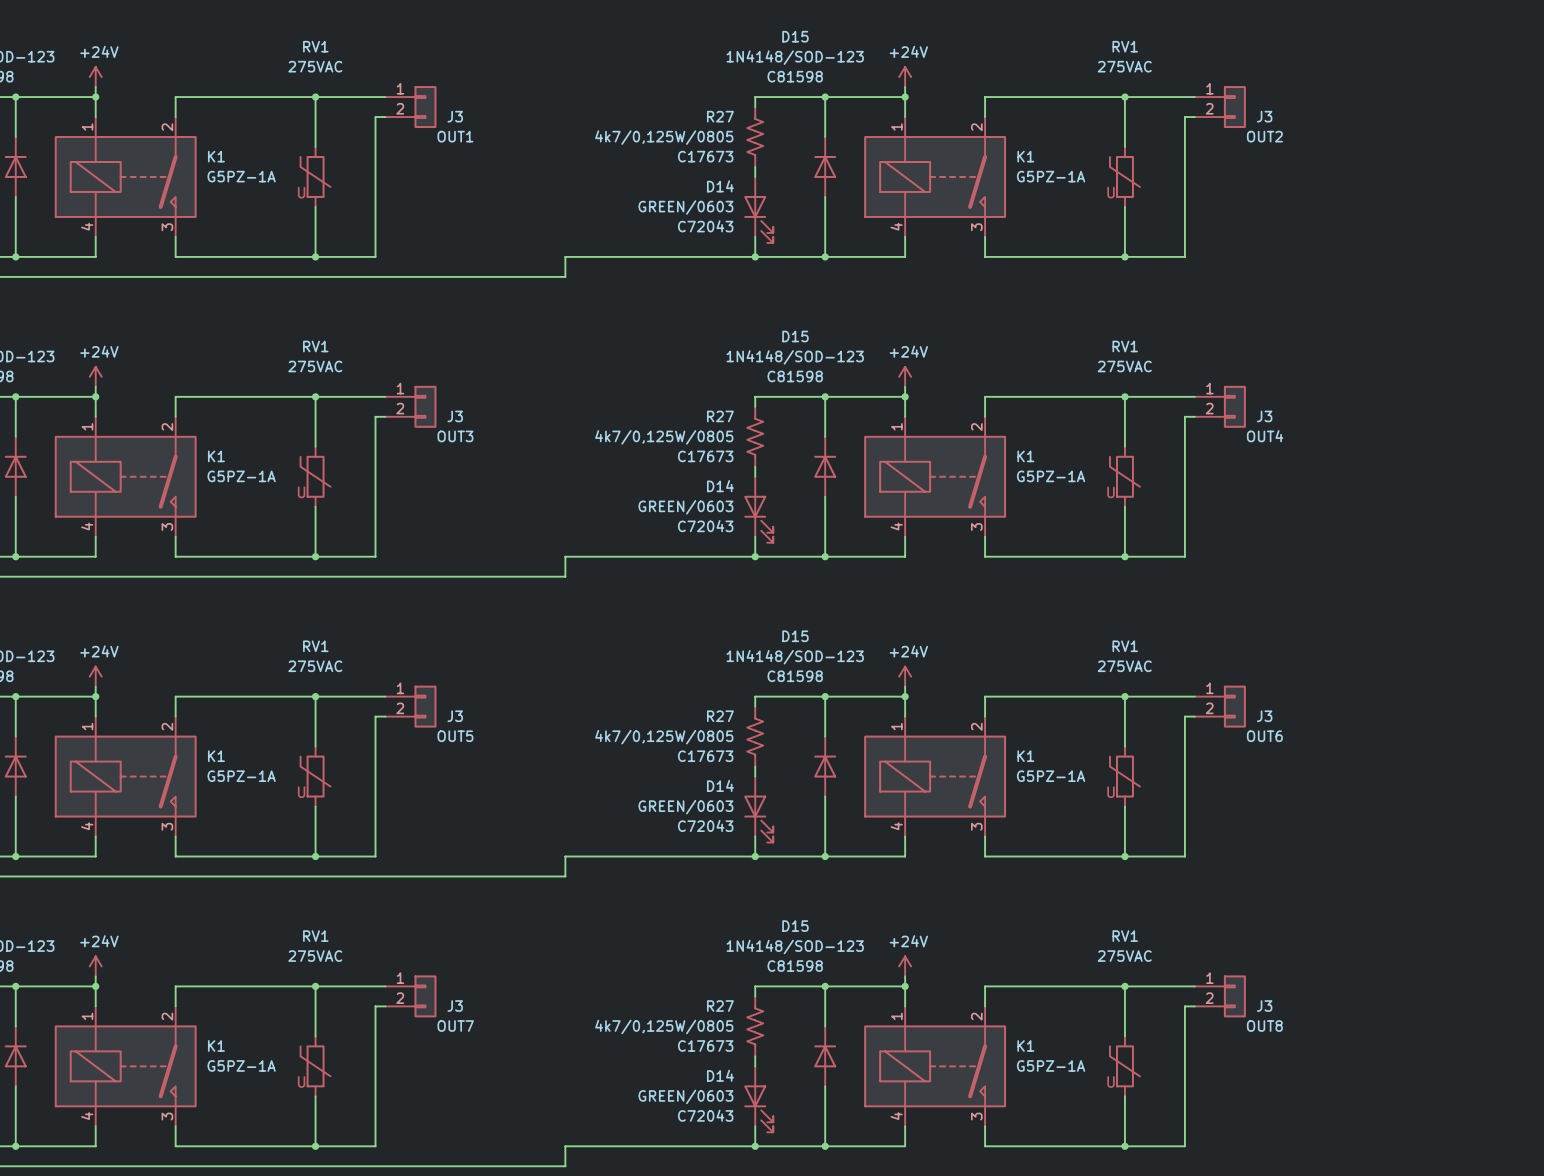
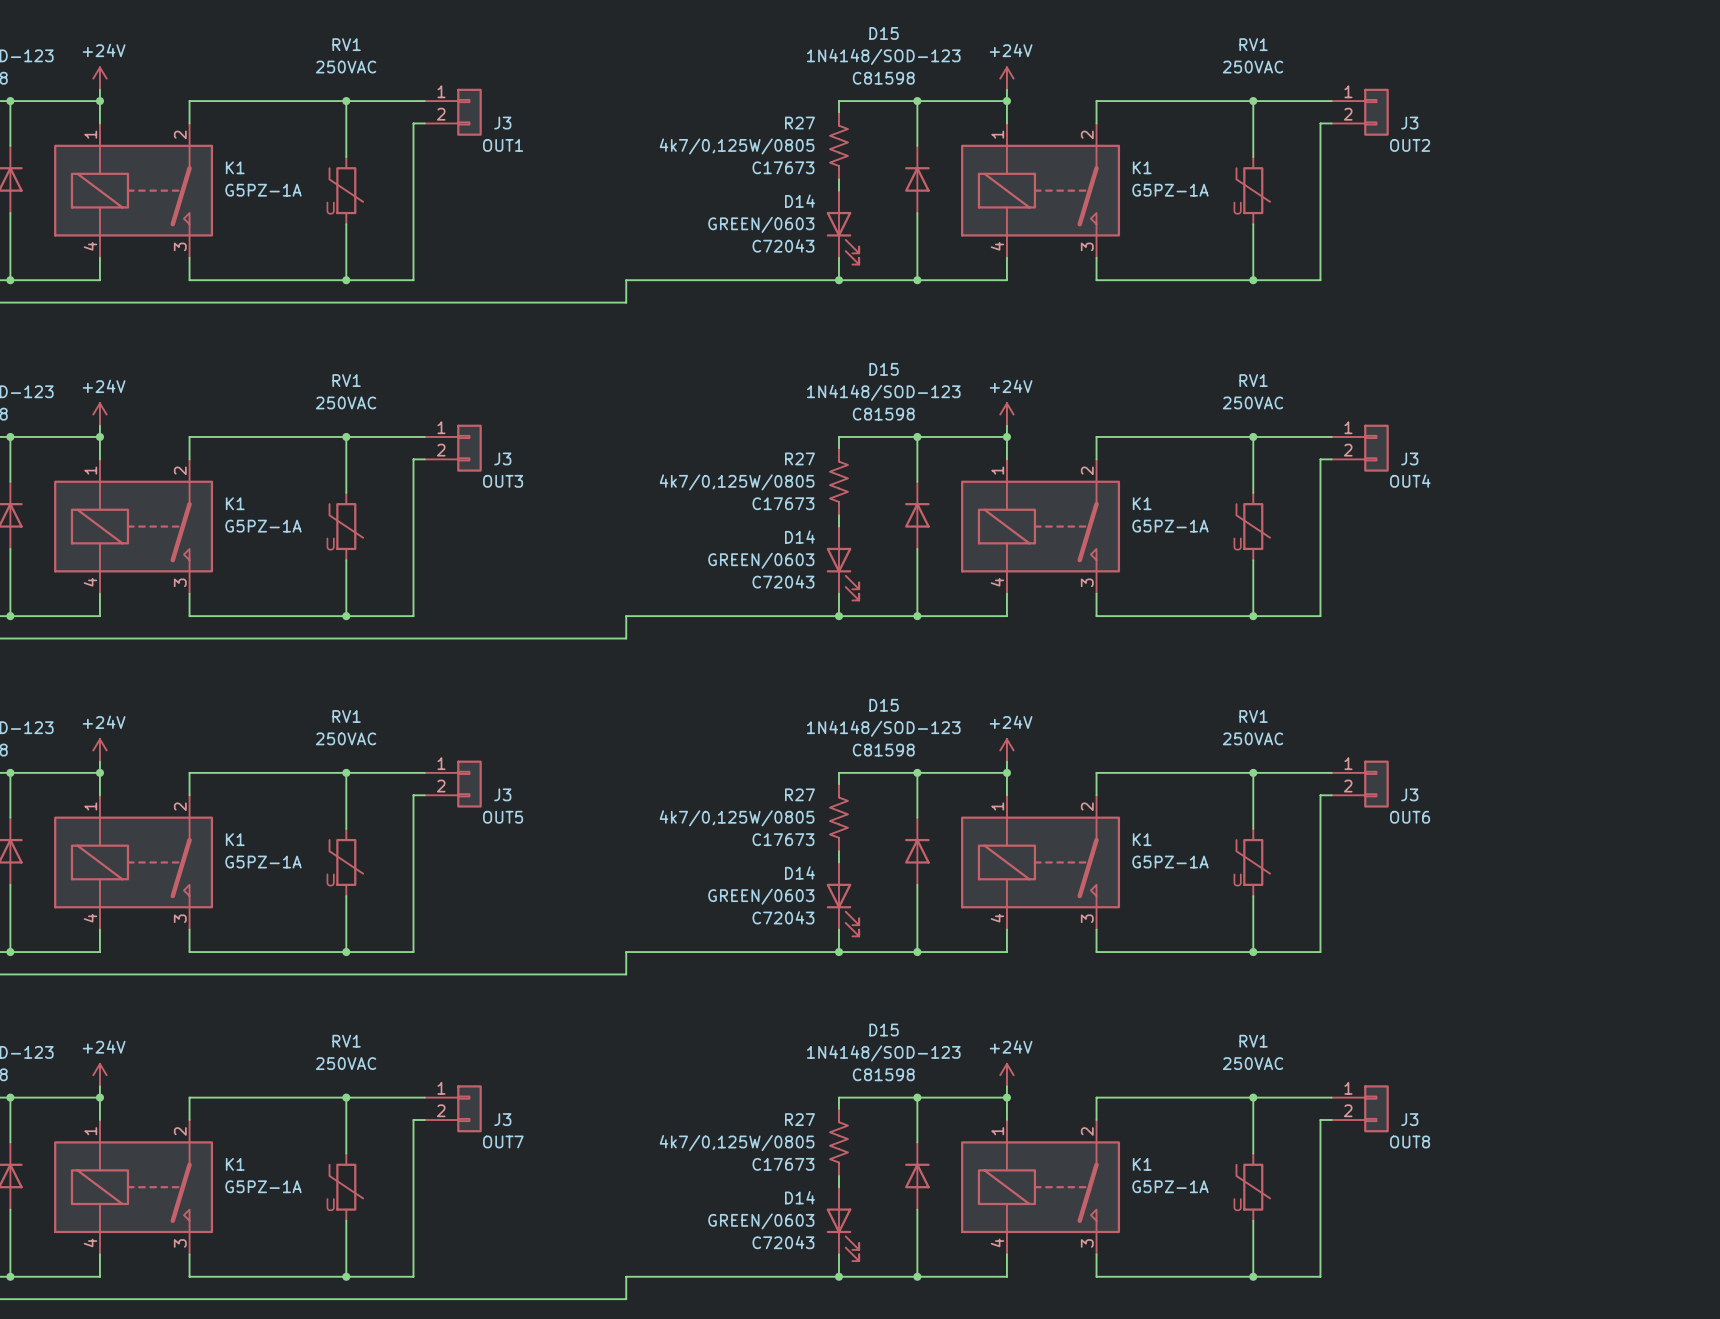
RV1 value: 275VAC (315, 66) -> 250VAC (346, 67)
RV1 value: 275VAC (1124, 66) -> 250VAC (1253, 67)
RV1 value: 275VAC (315, 366) -> 250VAC (346, 402)
RV1 value: 275VAC (1124, 366) -> 250VAC (1253, 402)
RV1 value: 275VAC (315, 666) -> 250VAC (346, 738)
RV1 value: 275VAC (1124, 666) -> 250VAC (1253, 738)
RV1 value: 275VAC (315, 956) -> 250VAC (346, 1063)
RV1 value: 275VAC (1124, 956) -> 250VAC (1253, 1063)

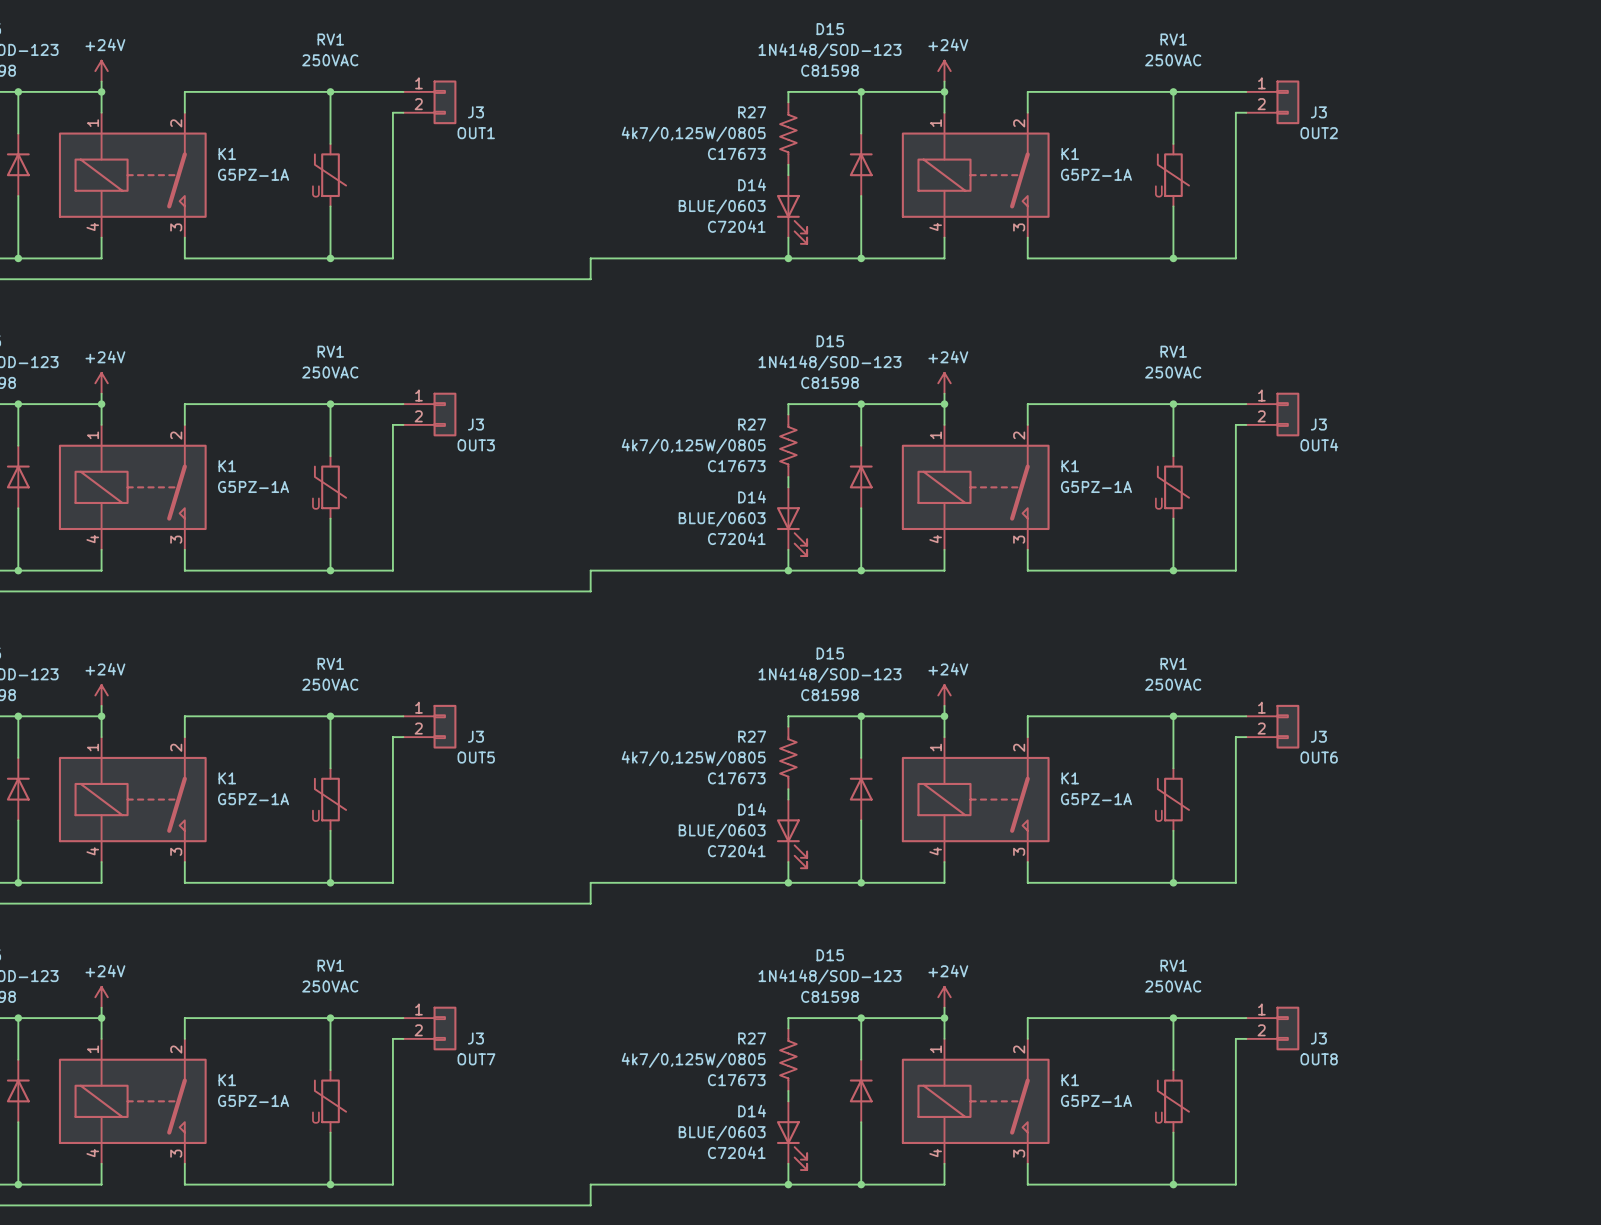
D14 value: GREEN/0603 (761, 224) -> BLUE/0603 (722, 207)
D14 text: C72043 (783, 245) -> C72041 (736, 226)
D14 value: GREEN/0603 (761, 560) -> BLUE/0603 (722, 519)
D14 text: C72043 (783, 581) -> C72041 (736, 538)
D14 value: GREEN/0603 (761, 896) -> BLUE/0603 (722, 831)
D14 text: C72043 (783, 917) -> C72041 (736, 850)
D14 value: GREEN/0603 (761, 1221) -> BLUE/0603 (722, 1133)
D14 text: C72043 (783, 1242) -> C72041 (736, 1152)

